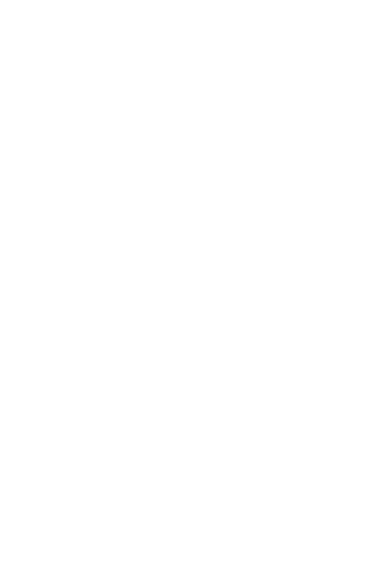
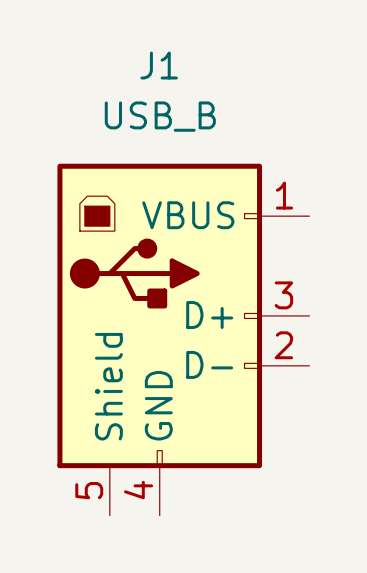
J1: none -> USB_B (183, 339)

